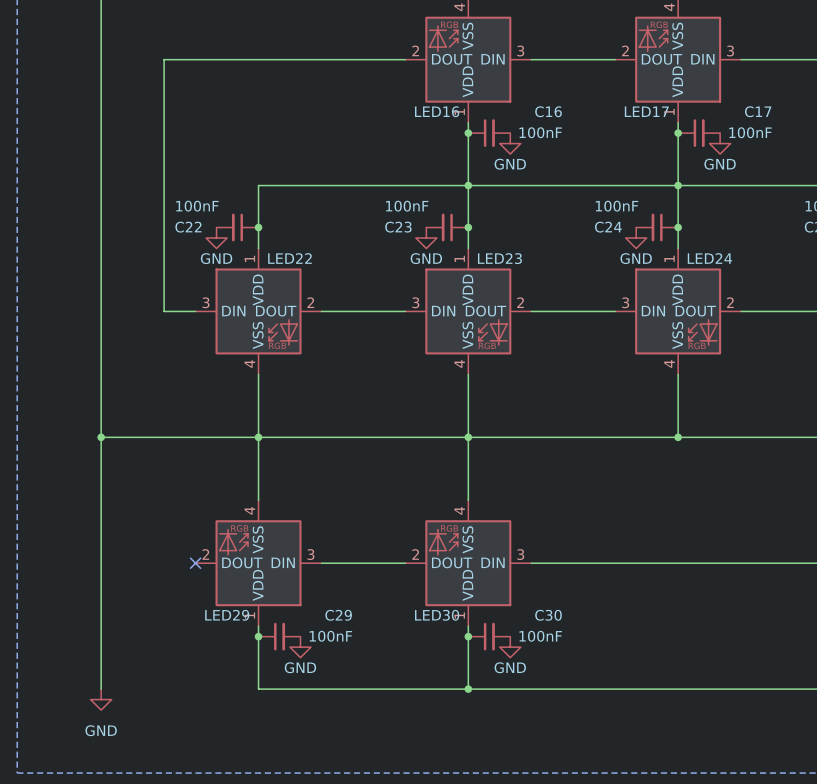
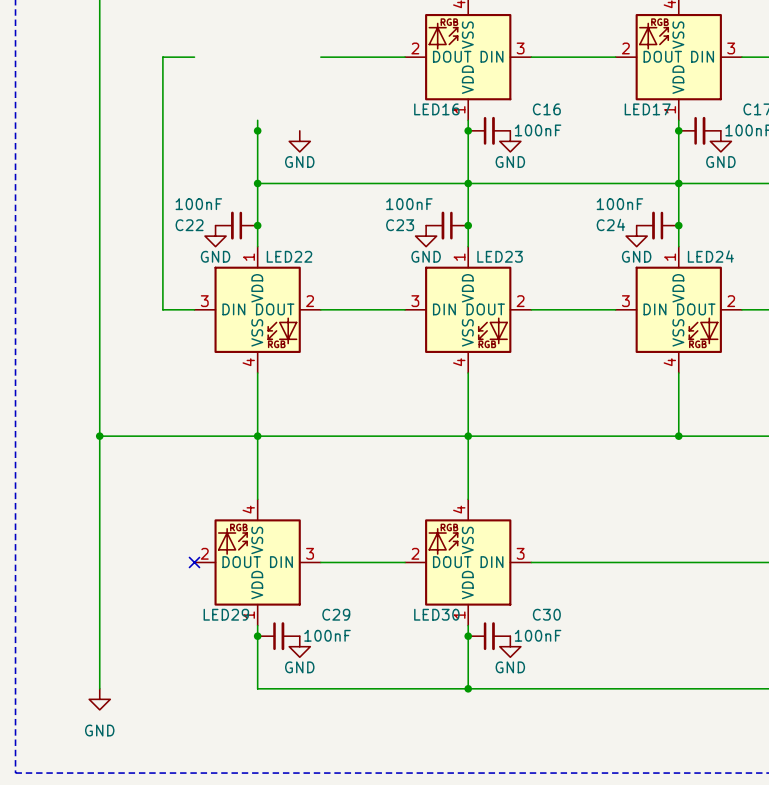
wire: (195, 59) (321, 59) -> none
wire: none -> (257, 120) (257, 183)
junction: none -> (257, 130)
power symbol: none -> GND (299, 141)
junction: none -> (257, 183)

